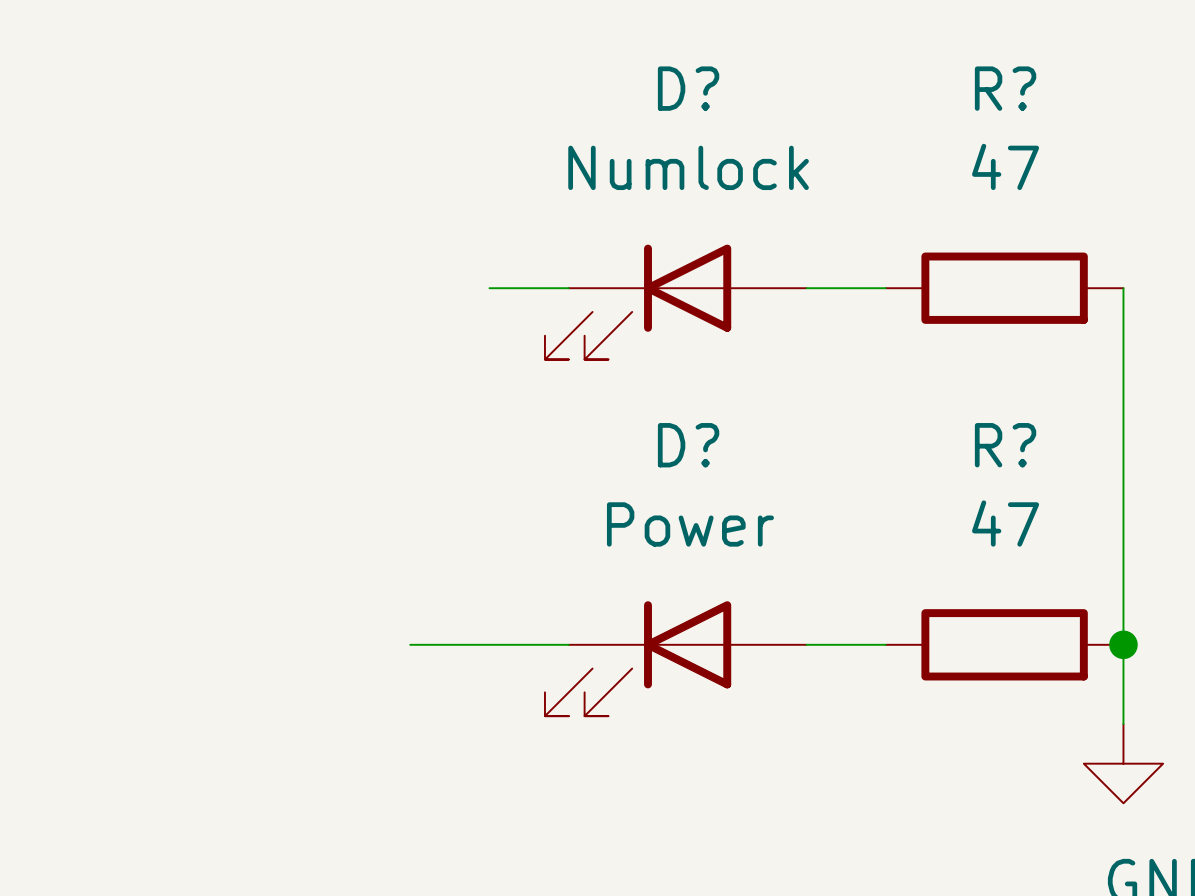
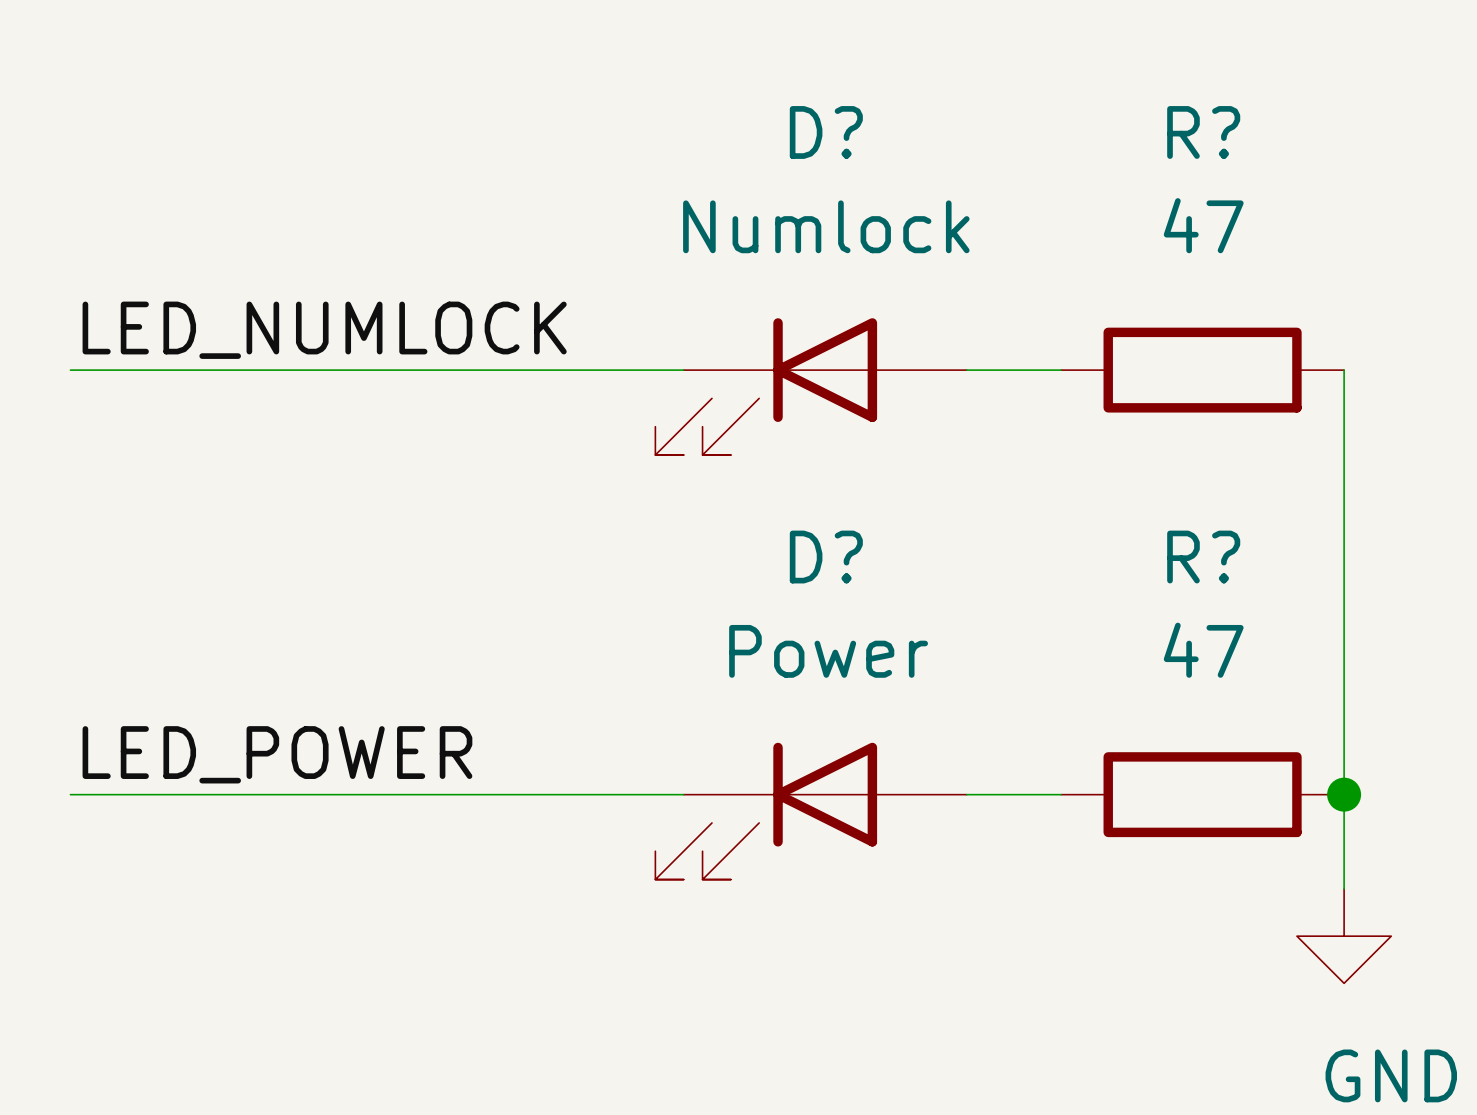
label: none -> LED_NUMLOCK (324, 330)
wire: none -> (70, 370) (589, 370)
label: none -> LED_POWER (277, 754)
wire: none -> (70, 794) (494, 794)

